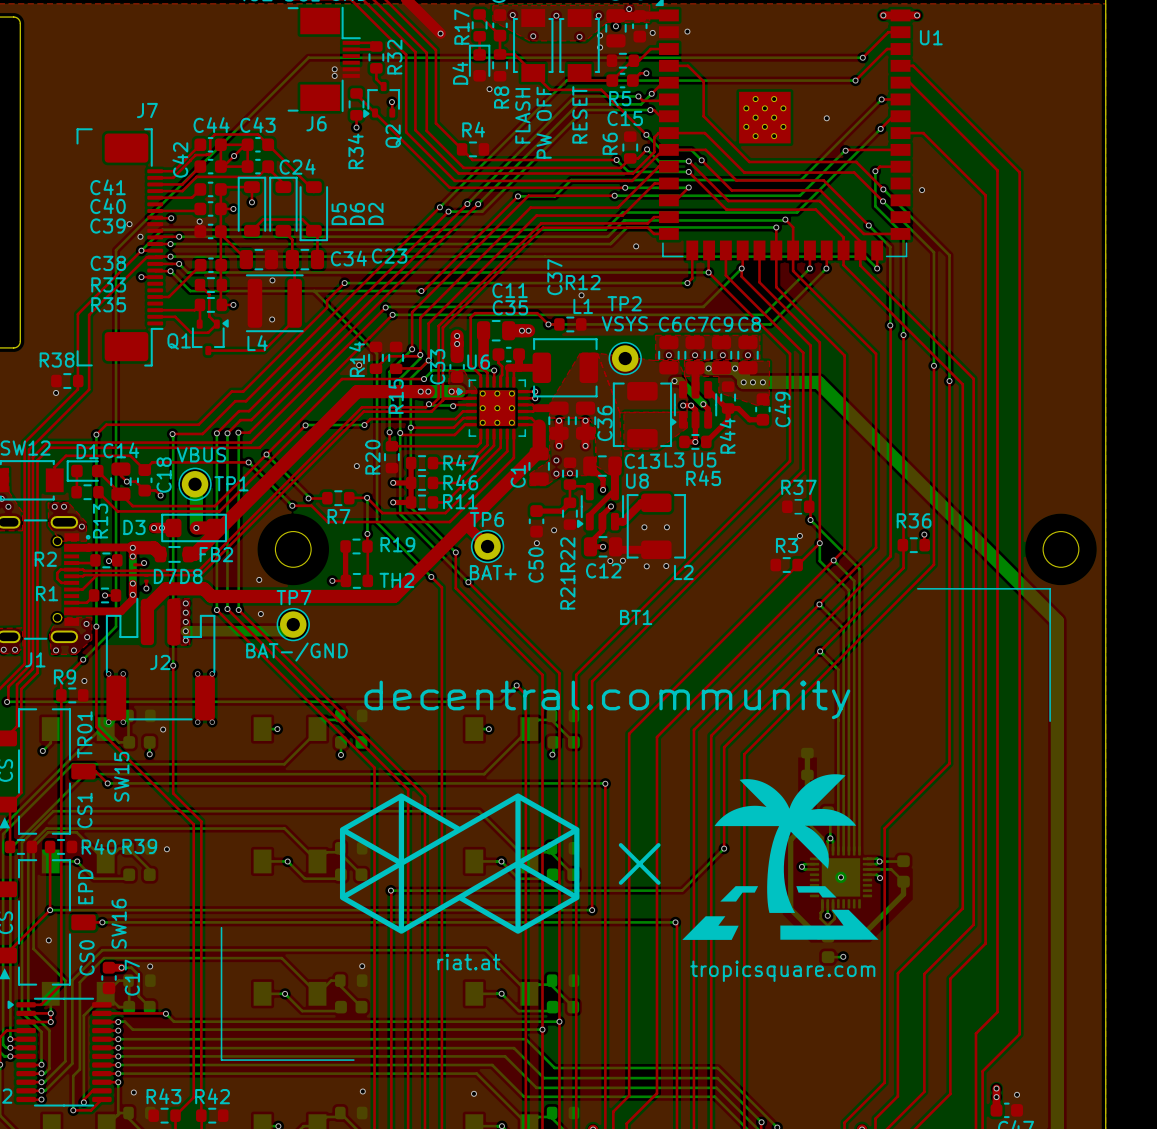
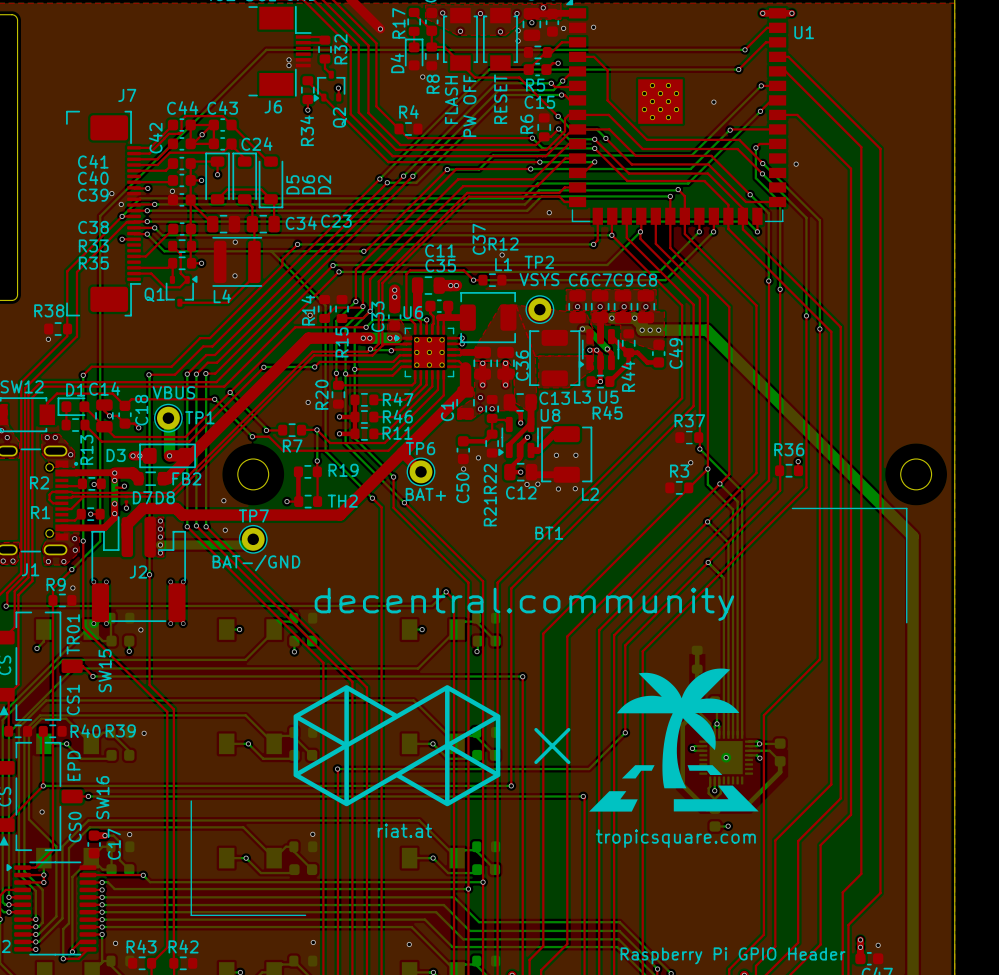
text: none -> Raspberry Pi GPIO Header (733, 955)

